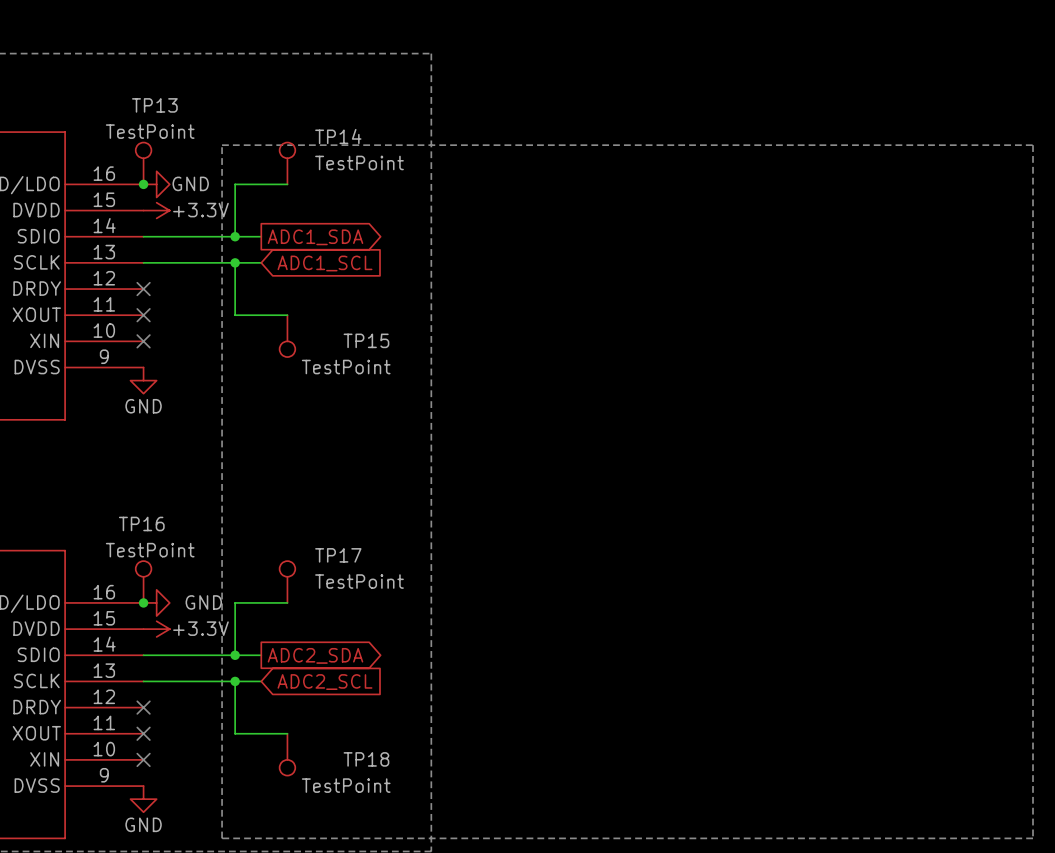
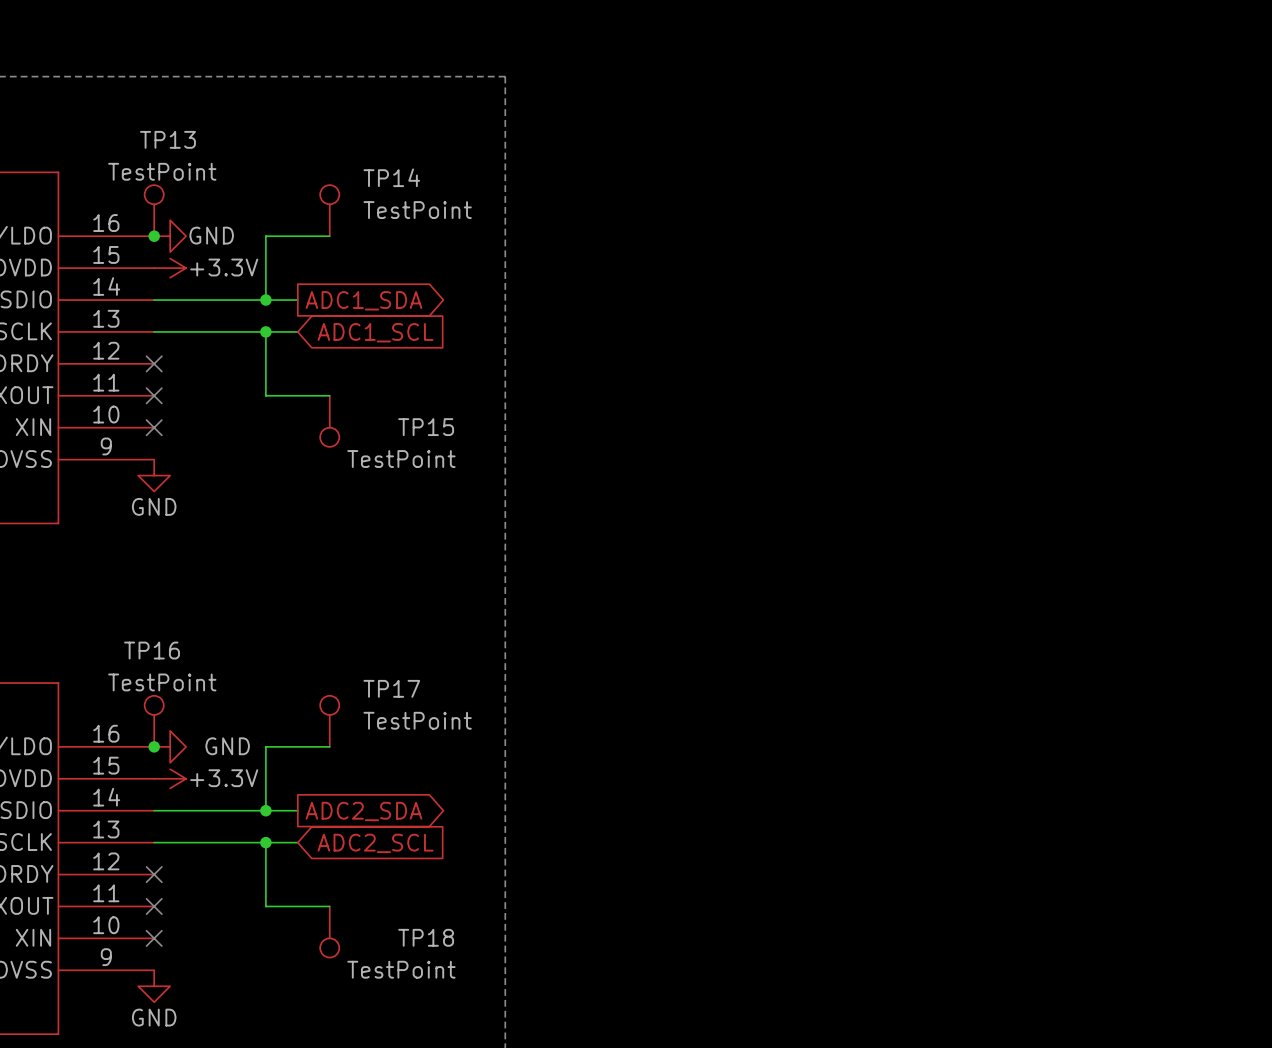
line: (222, 145) (1033, 145) (1033, 838) (222, 838) (222, 145) -> none

